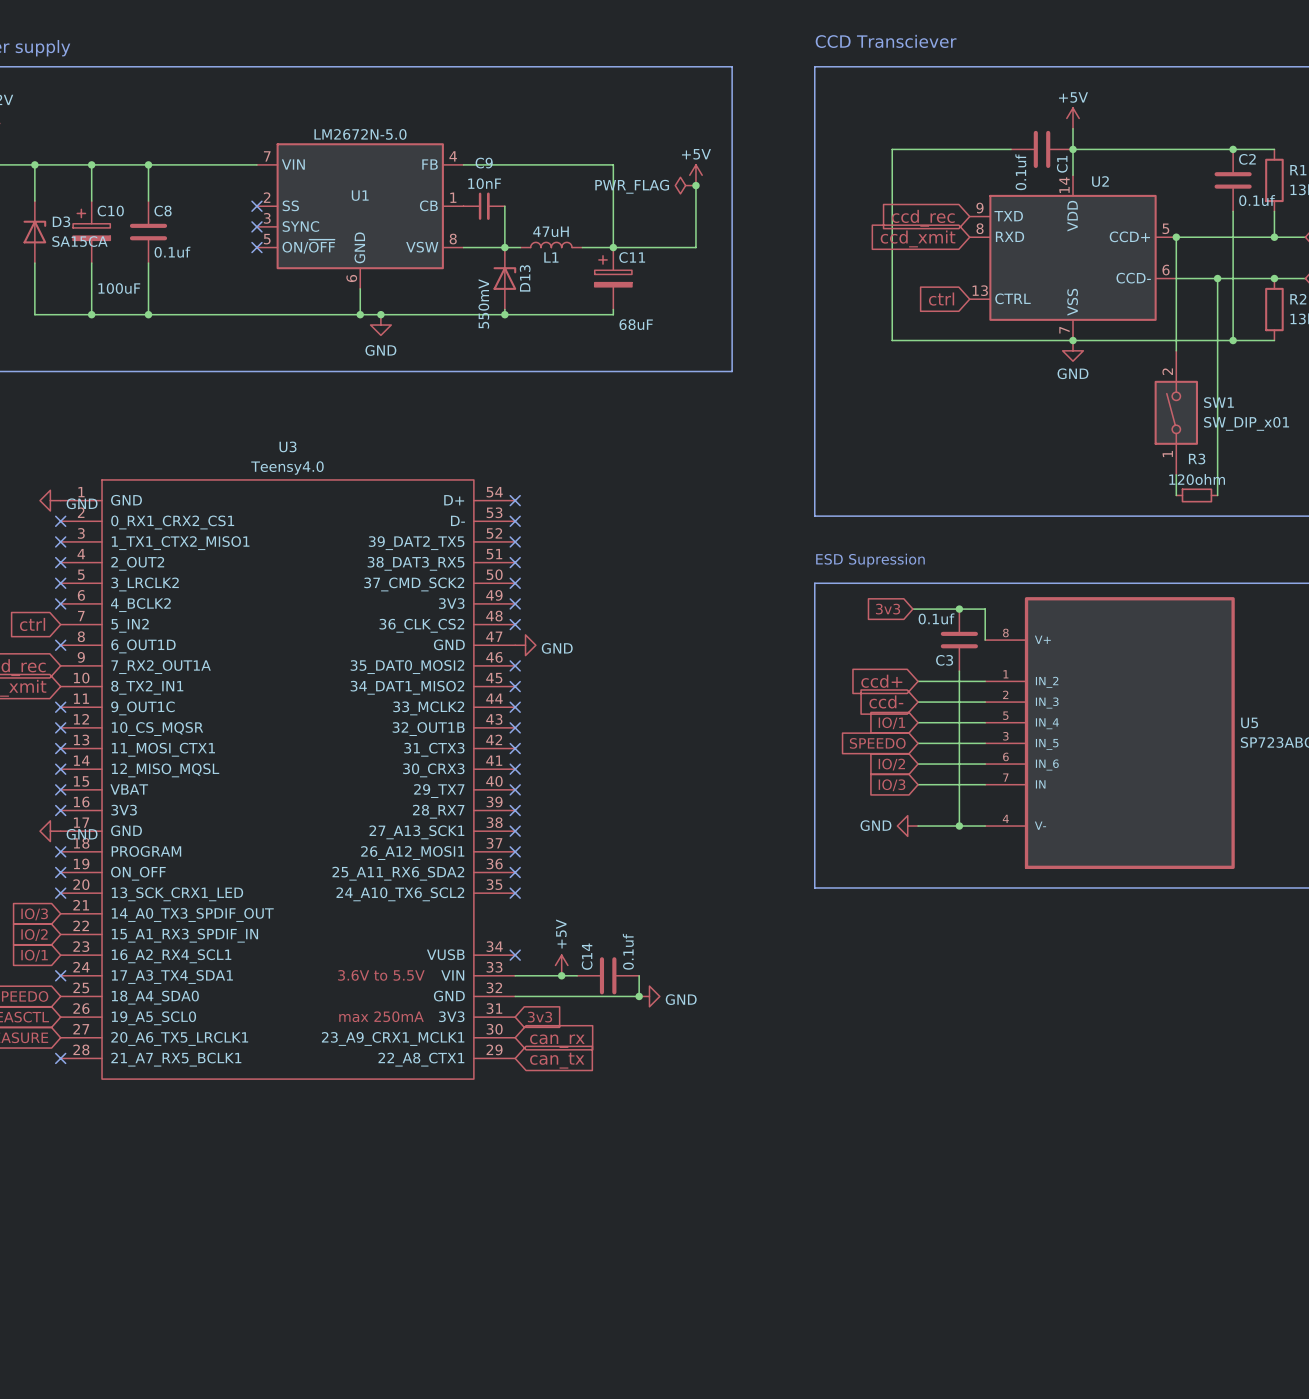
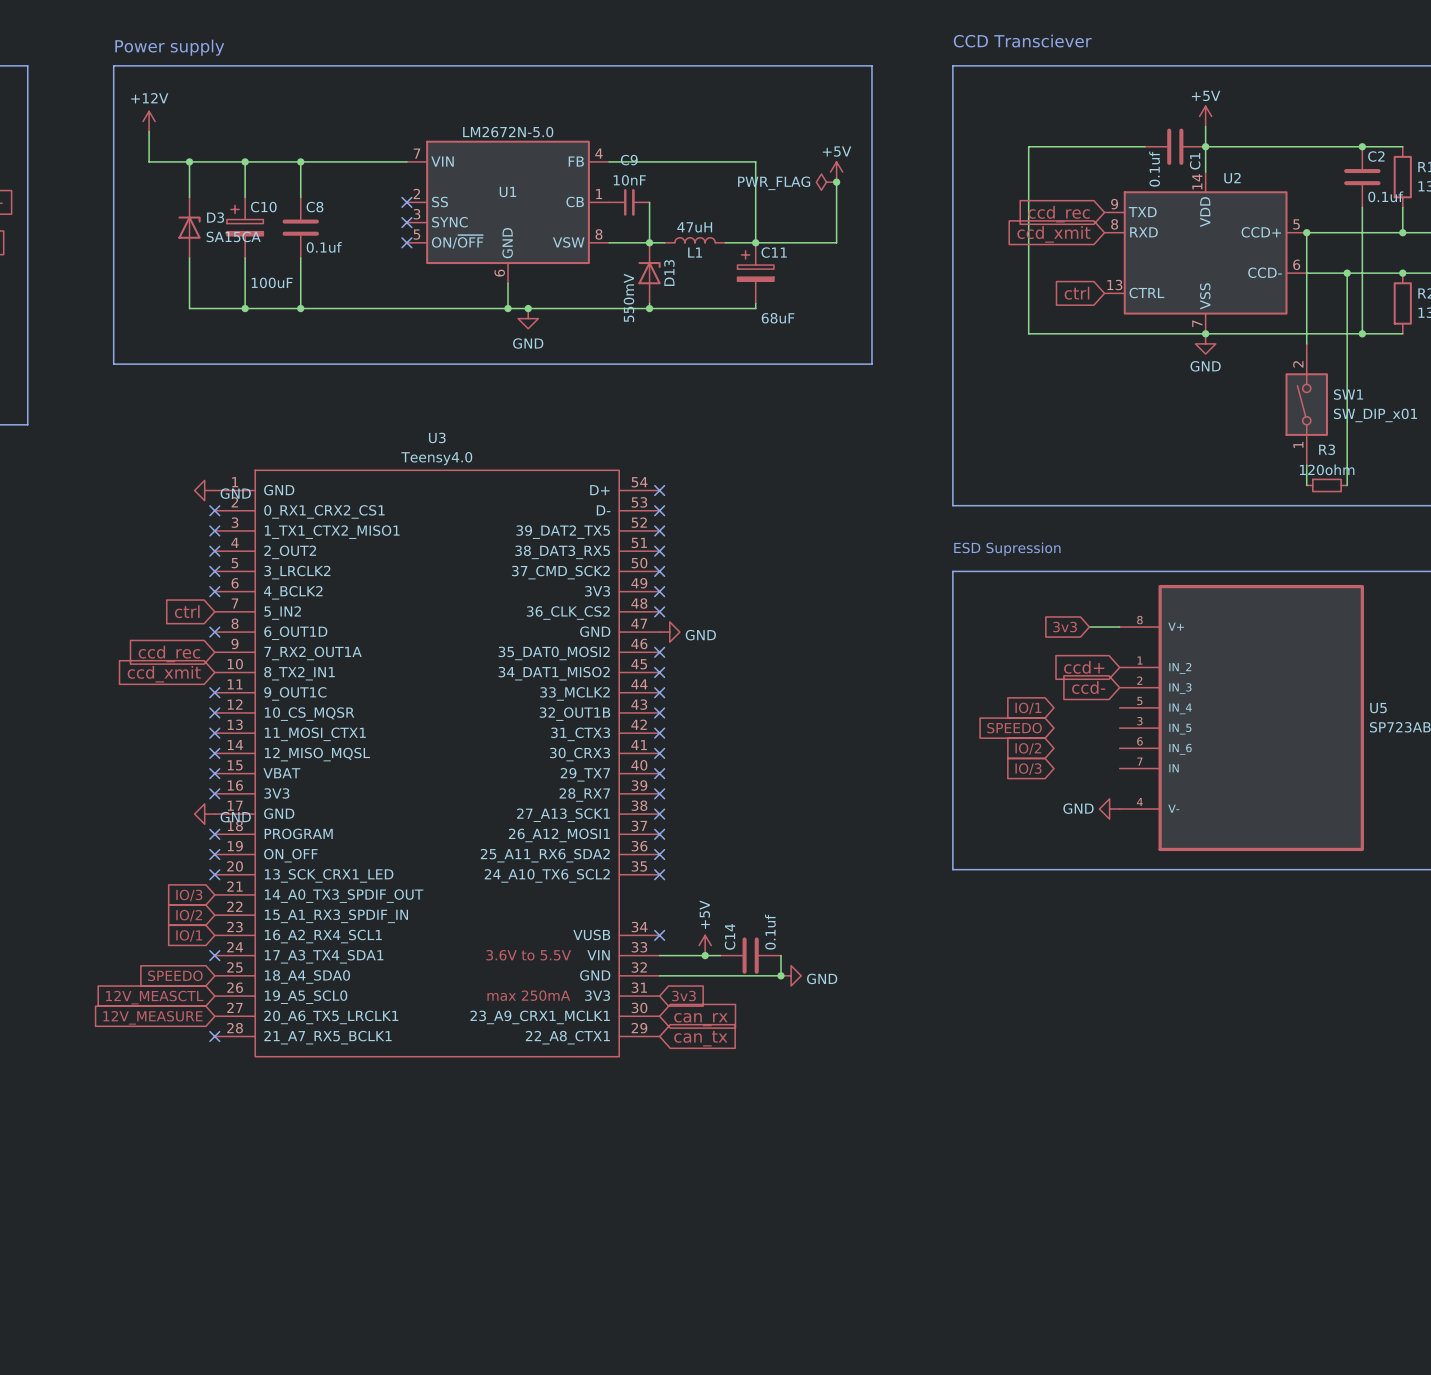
global label position: 3v3 (888, 609) -> 3v3 (1065, 627)
wire: (912, 609) (985, 609) (985, 640) -> (1089, 627) (1119, 627)
junction: (959, 609) -> none
C3: 0.1uf (959, 640) -> none
wire: (959, 671) (959, 826) -> none
global label position: ccd+ (881, 681) -> ccd+ (1084, 667)
wire: (918, 681) (985, 681) -> none
global label position: ccd- (886, 701) -> ccd- (1088, 687)
wire: (918, 702) (985, 702) -> none
wire: (918, 722) (985, 722) -> none
wire: (918, 743) (985, 743) -> none
wire: (918, 764) (985, 764) -> none
wire: (918, 784) (985, 784) -> none
power symbol position: GND (907, 826) -> GND (1109, 809)
wire: (918, 826) (985, 826) -> none
junction: (959, 826) -> none

